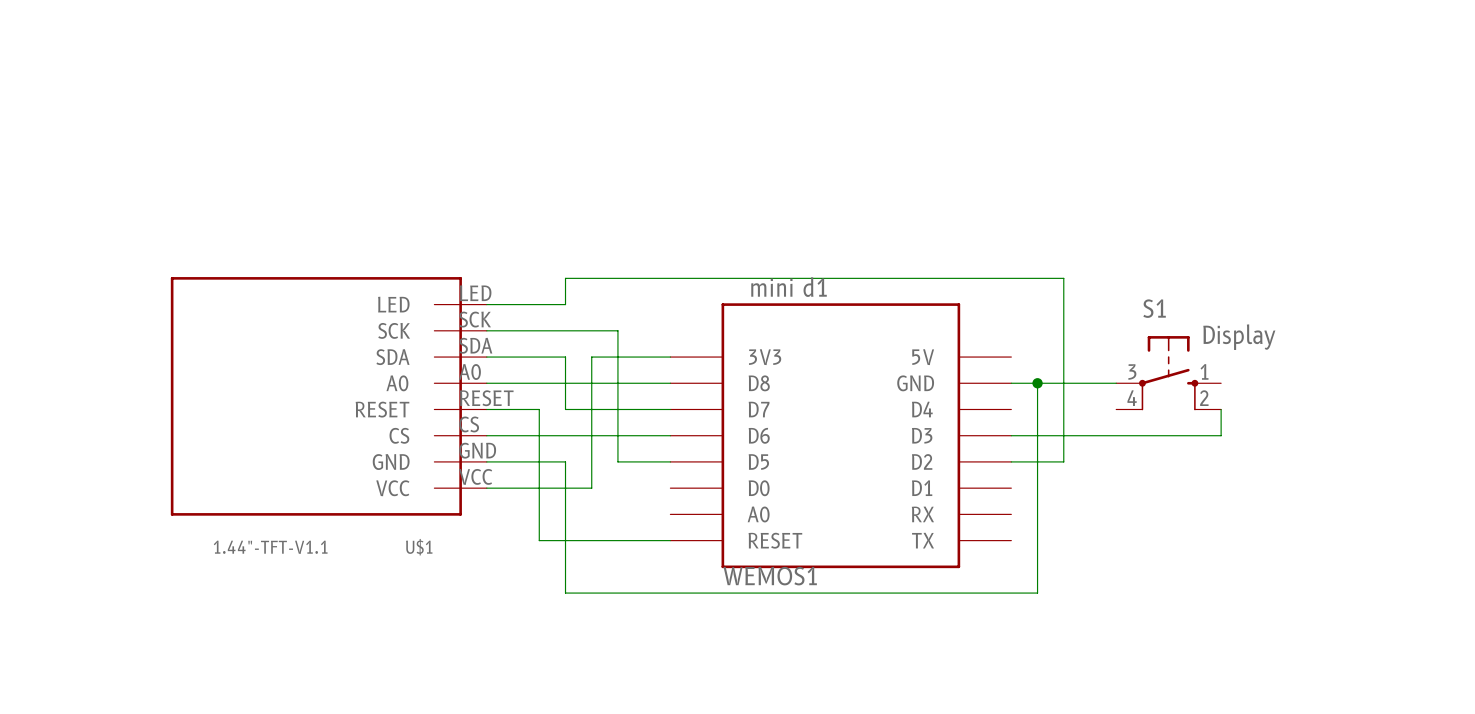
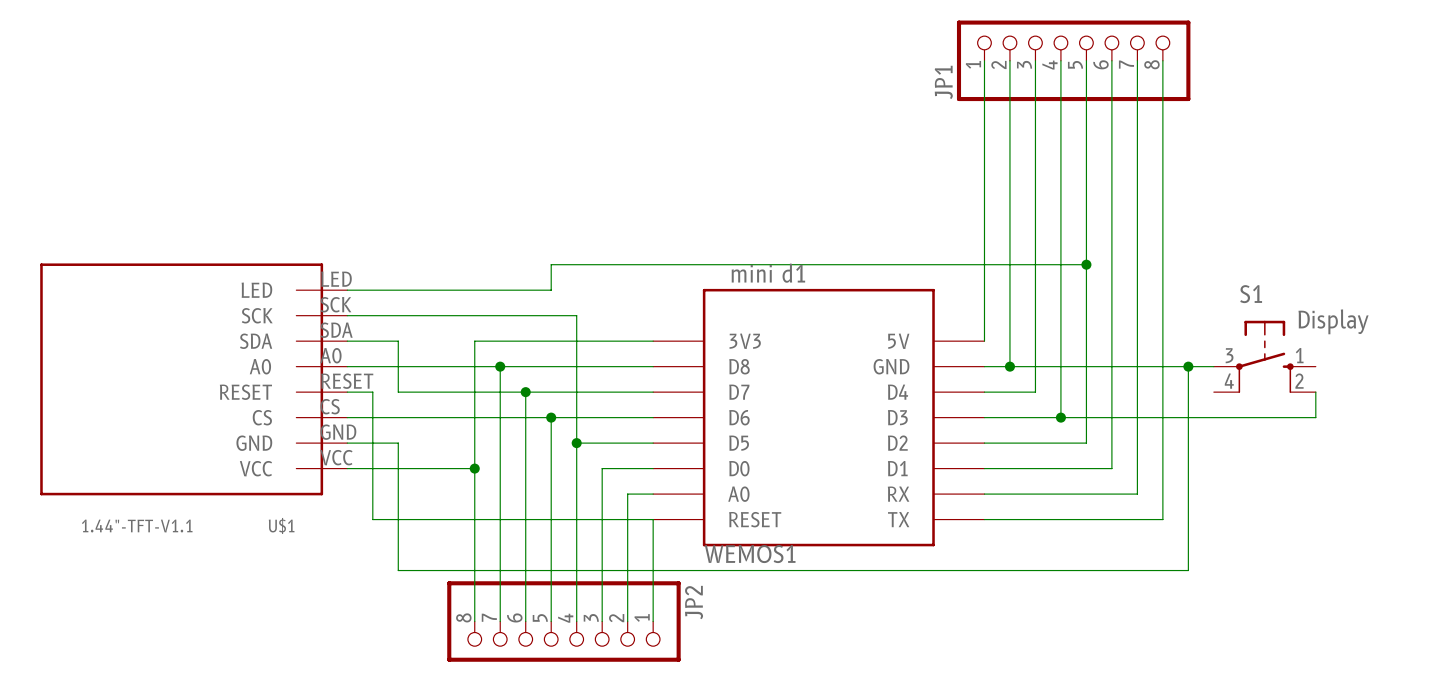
wire: none -> (984, 60) (984, 341)
wire: none -> (1009, 60) (1009, 366)
wire: none -> (1035, 60) (1035, 264) (1086, 264)
wire: none -> (1060, 60) (1060, 417)
JP1: none -> (1073, 60)
wire: none -> (1086, 60) (1086, 443) (1035, 443)
wire: none -> (1111, 60) (1111, 468) (984, 468)
wire: none -> (1137, 60) (1137, 494) (984, 494)
wire: none -> (1162, 60) (1162, 519) (984, 519)
junction: none -> (1086, 264)
wire: none -> (347, 290) (474, 290)
wire: none -> (347, 315) (474, 315)
wire: (591, 330) (617, 330) (617, 461) -> (576, 315) (576, 341) (551, 341)
wire: none -> (347, 341) (398, 341) (398, 392) (474, 392)
wire: none -> (474, 341) (474, 621)
wire: (565, 357) (565, 409) -> (525, 392) (551, 392)
S1 position: (1168, 373) -> (1264, 356)
wire: none -> (347, 366) (474, 366)
wire: none -> (500, 366) (500, 621)
junction: none -> (500, 366)
wire: (1037, 383) (1037, 593) -> (1315, 392) (1315, 417) (1188, 417) (1188, 570) (1009, 570)
wire: none -> (1086, 366) (1213, 366)
wire: none -> (1188, 366) (1188, 392)
junction: none -> (1188, 366)
U$1 position: (328, 396) -> (193, 379)
wire: none -> (347, 392) (372, 392) (372, 519) (525, 519) (525, 621)
junction: none -> (525, 392)
wire: (1063, 409) (1063, 461) -> (1035, 392) (984, 392)
wire: none -> (347, 417) (474, 417)
junction: none -> (551, 417)
junction: none -> (1060, 417)
wire: none -> (347, 443) (398, 443) (398, 570) (551, 570) (551, 621)
wire: (486, 461) (565, 461) -> (551, 417) (551, 443)
wire: none -> (576, 443) (602, 443)
junction: none -> (576, 443)
wire: none -> (347, 468) (474, 468)
wire: (486, 488) (591, 488) -> (576, 621) (576, 468)
junction: none -> (474, 468)
wire: none -> (653, 468) (602, 468) (602, 621)
wire: none -> (653, 494) (627, 494) (627, 621)
wire: none -> (653, 519) (653, 621)
JP2: none -> (563, 621)

